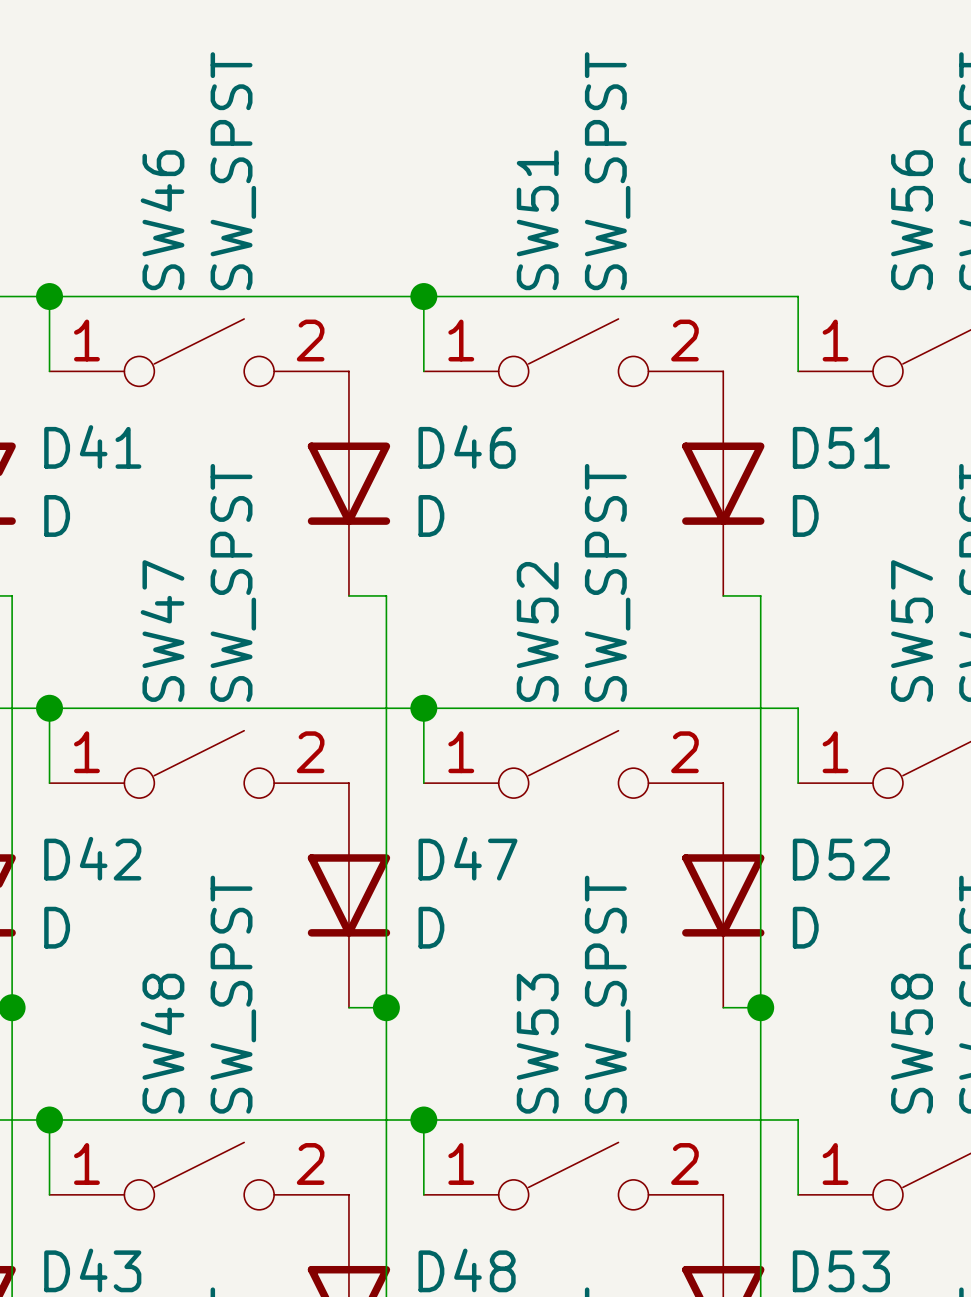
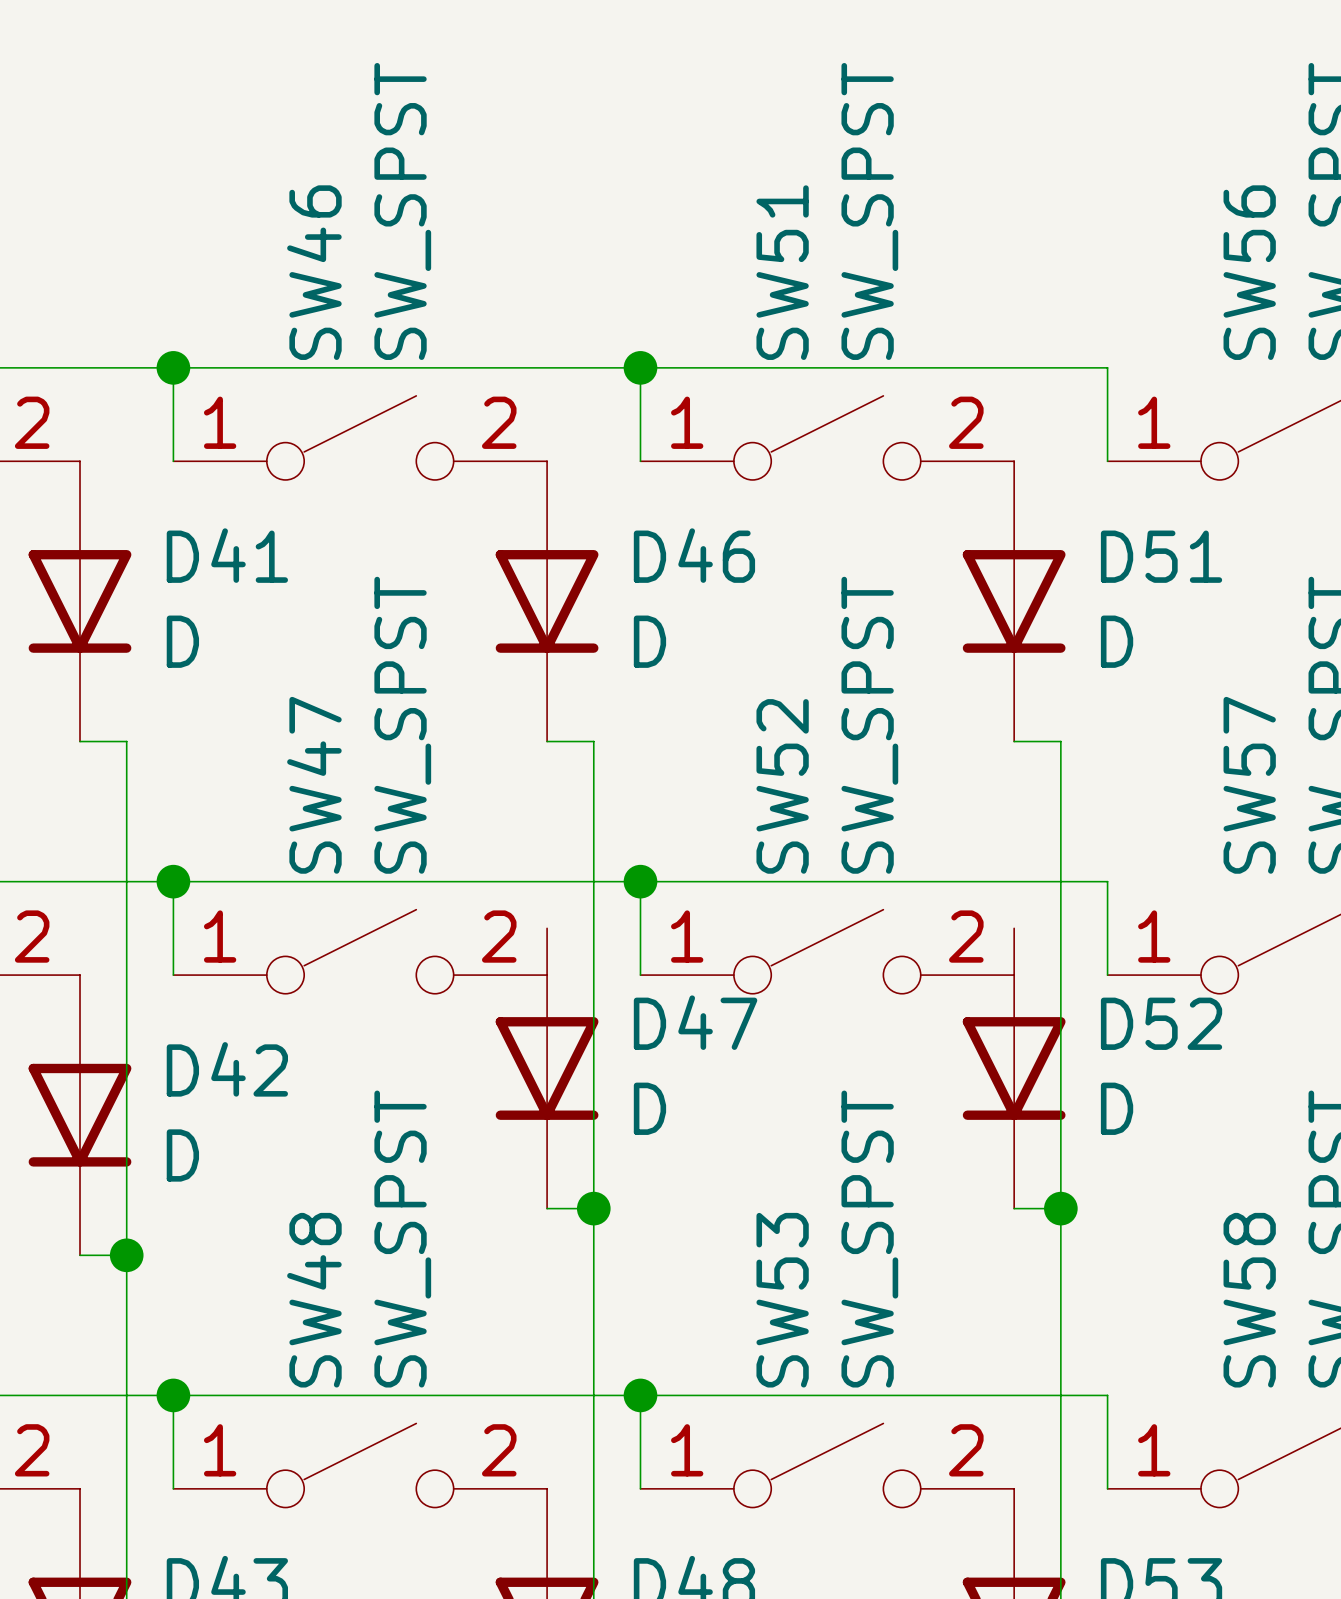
D47 position: (348, 895) -> (547, 1068)
D52 position: (723, 895) -> (1014, 1068)
wire: (348, 1007) (386, 1007) -> (547, 1208) (593, 1208)
junction position: (386, 1007) -> (593, 1208)
wire: (723, 1007) (760, 1007) -> (1014, 1208) (1060, 1208)
junction position: (760, 1007) -> (1060, 1208)

